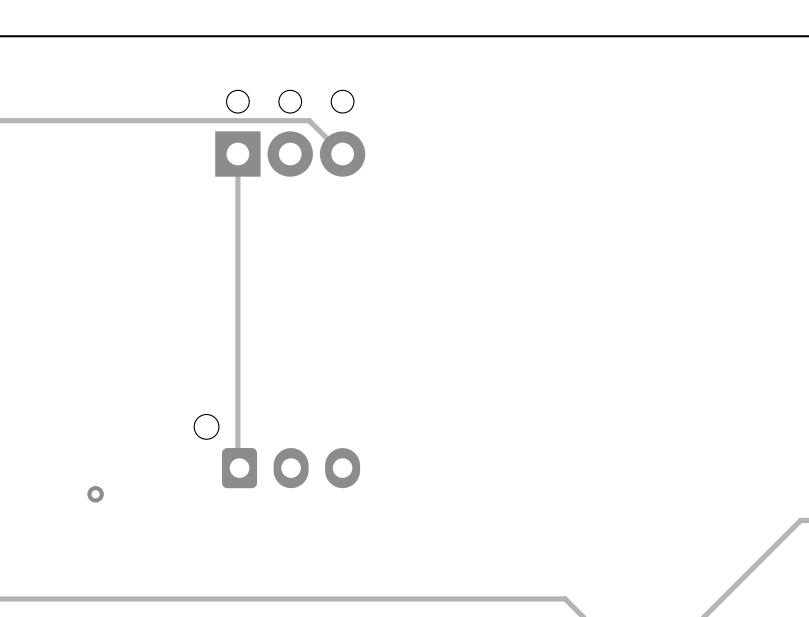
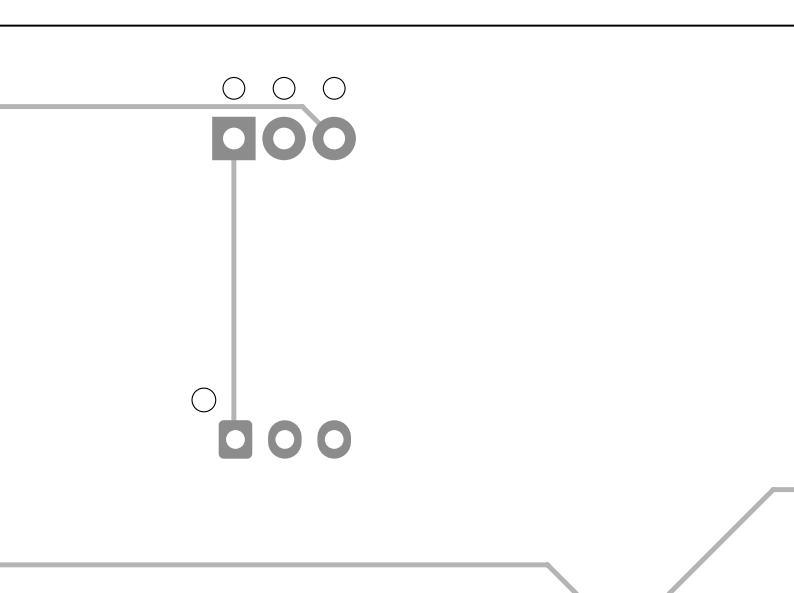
via: (95, 494) -> none

